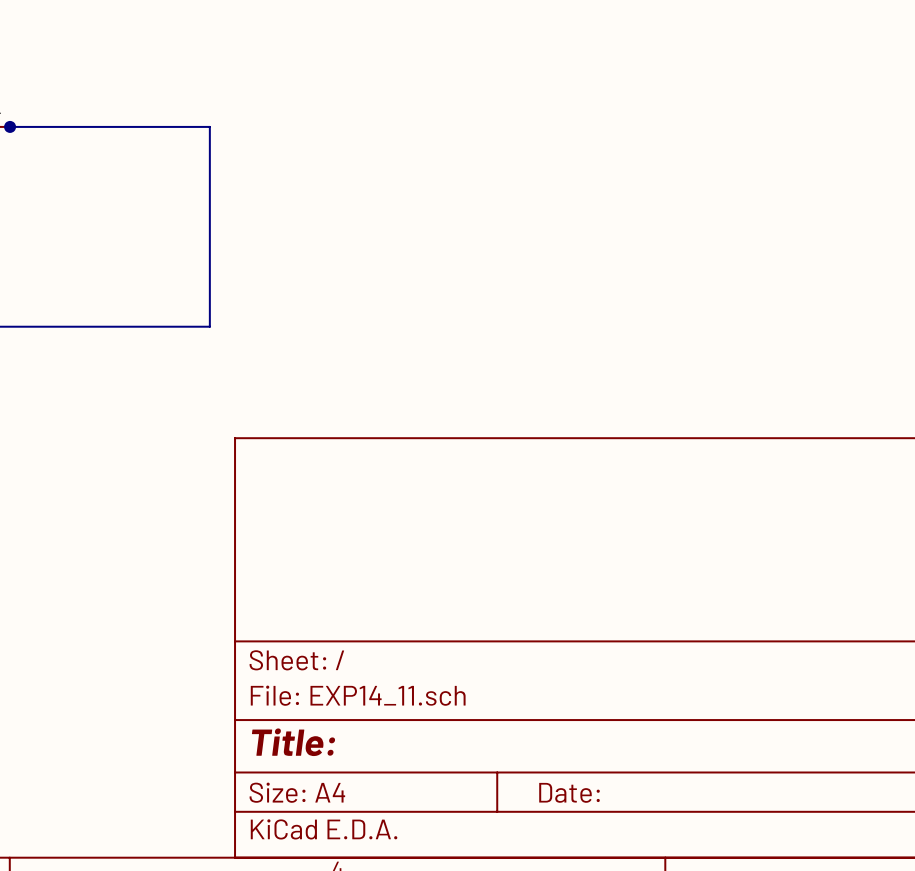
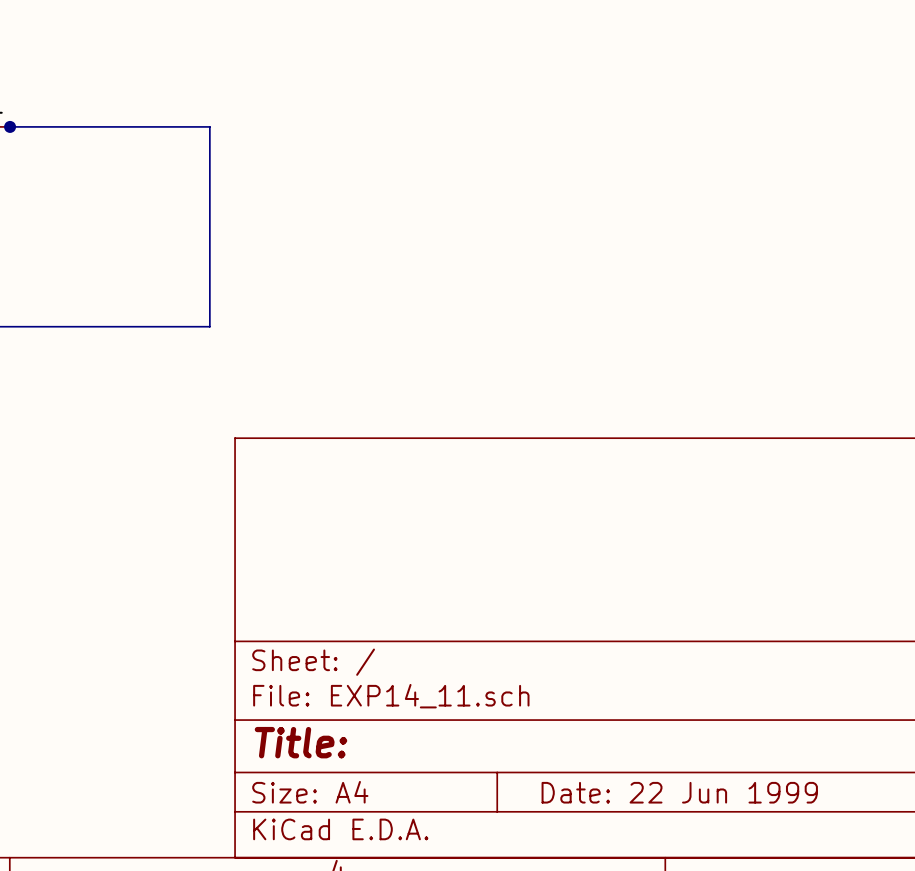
title block: Date: (569, 792) -> Date: 22 Jun 1999 (679, 792)

